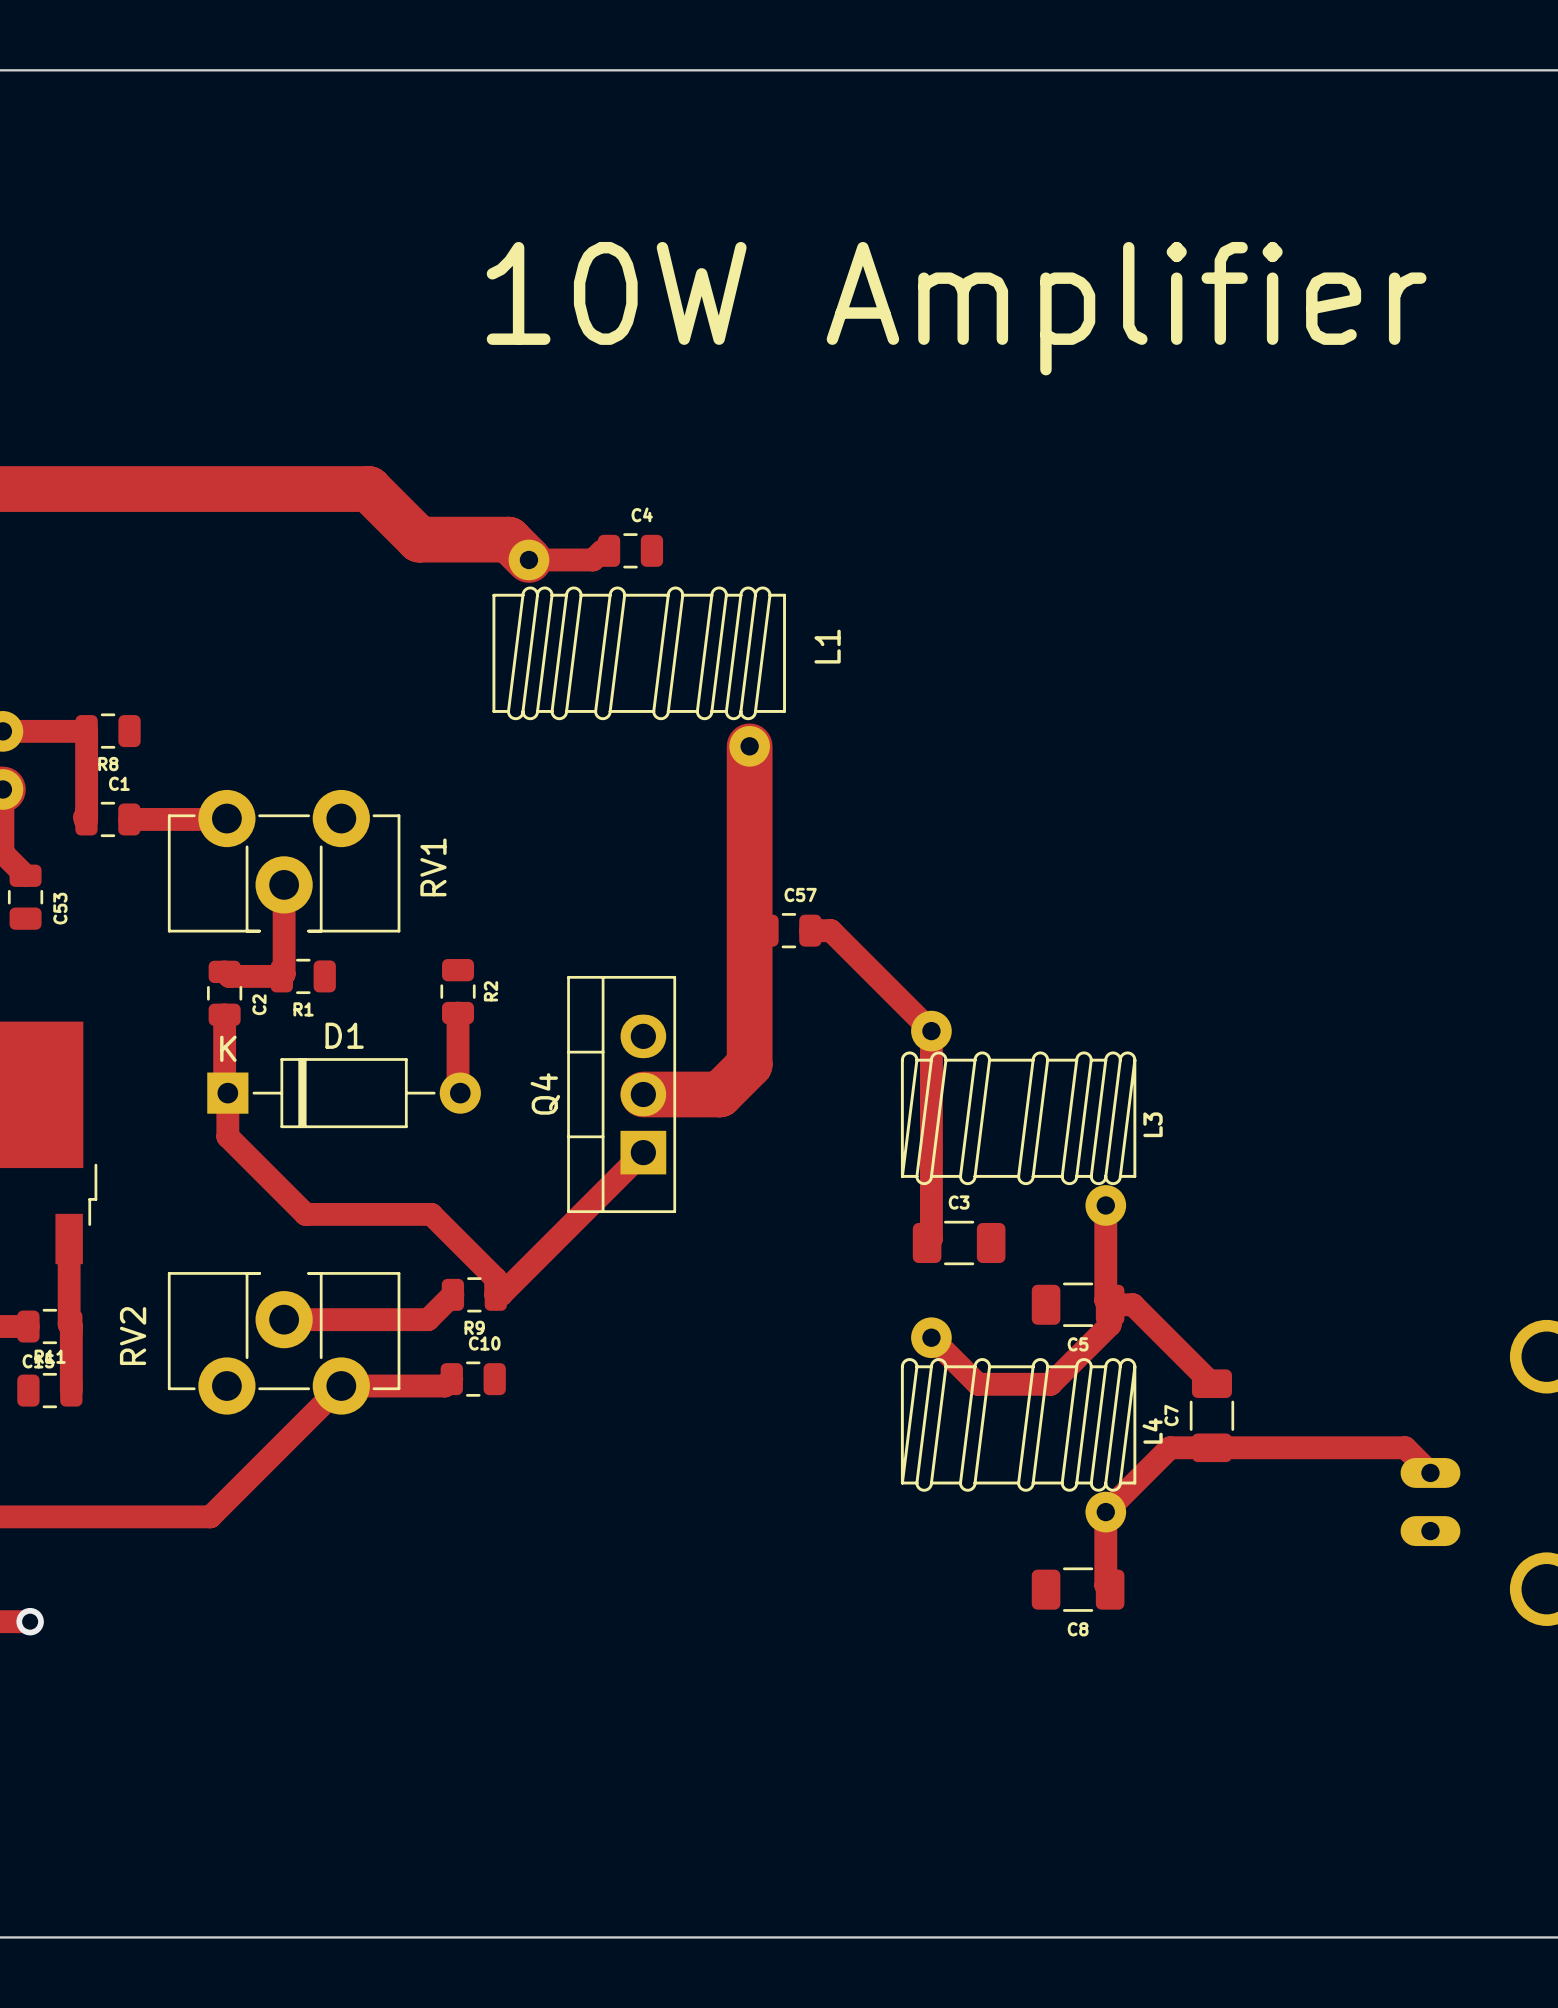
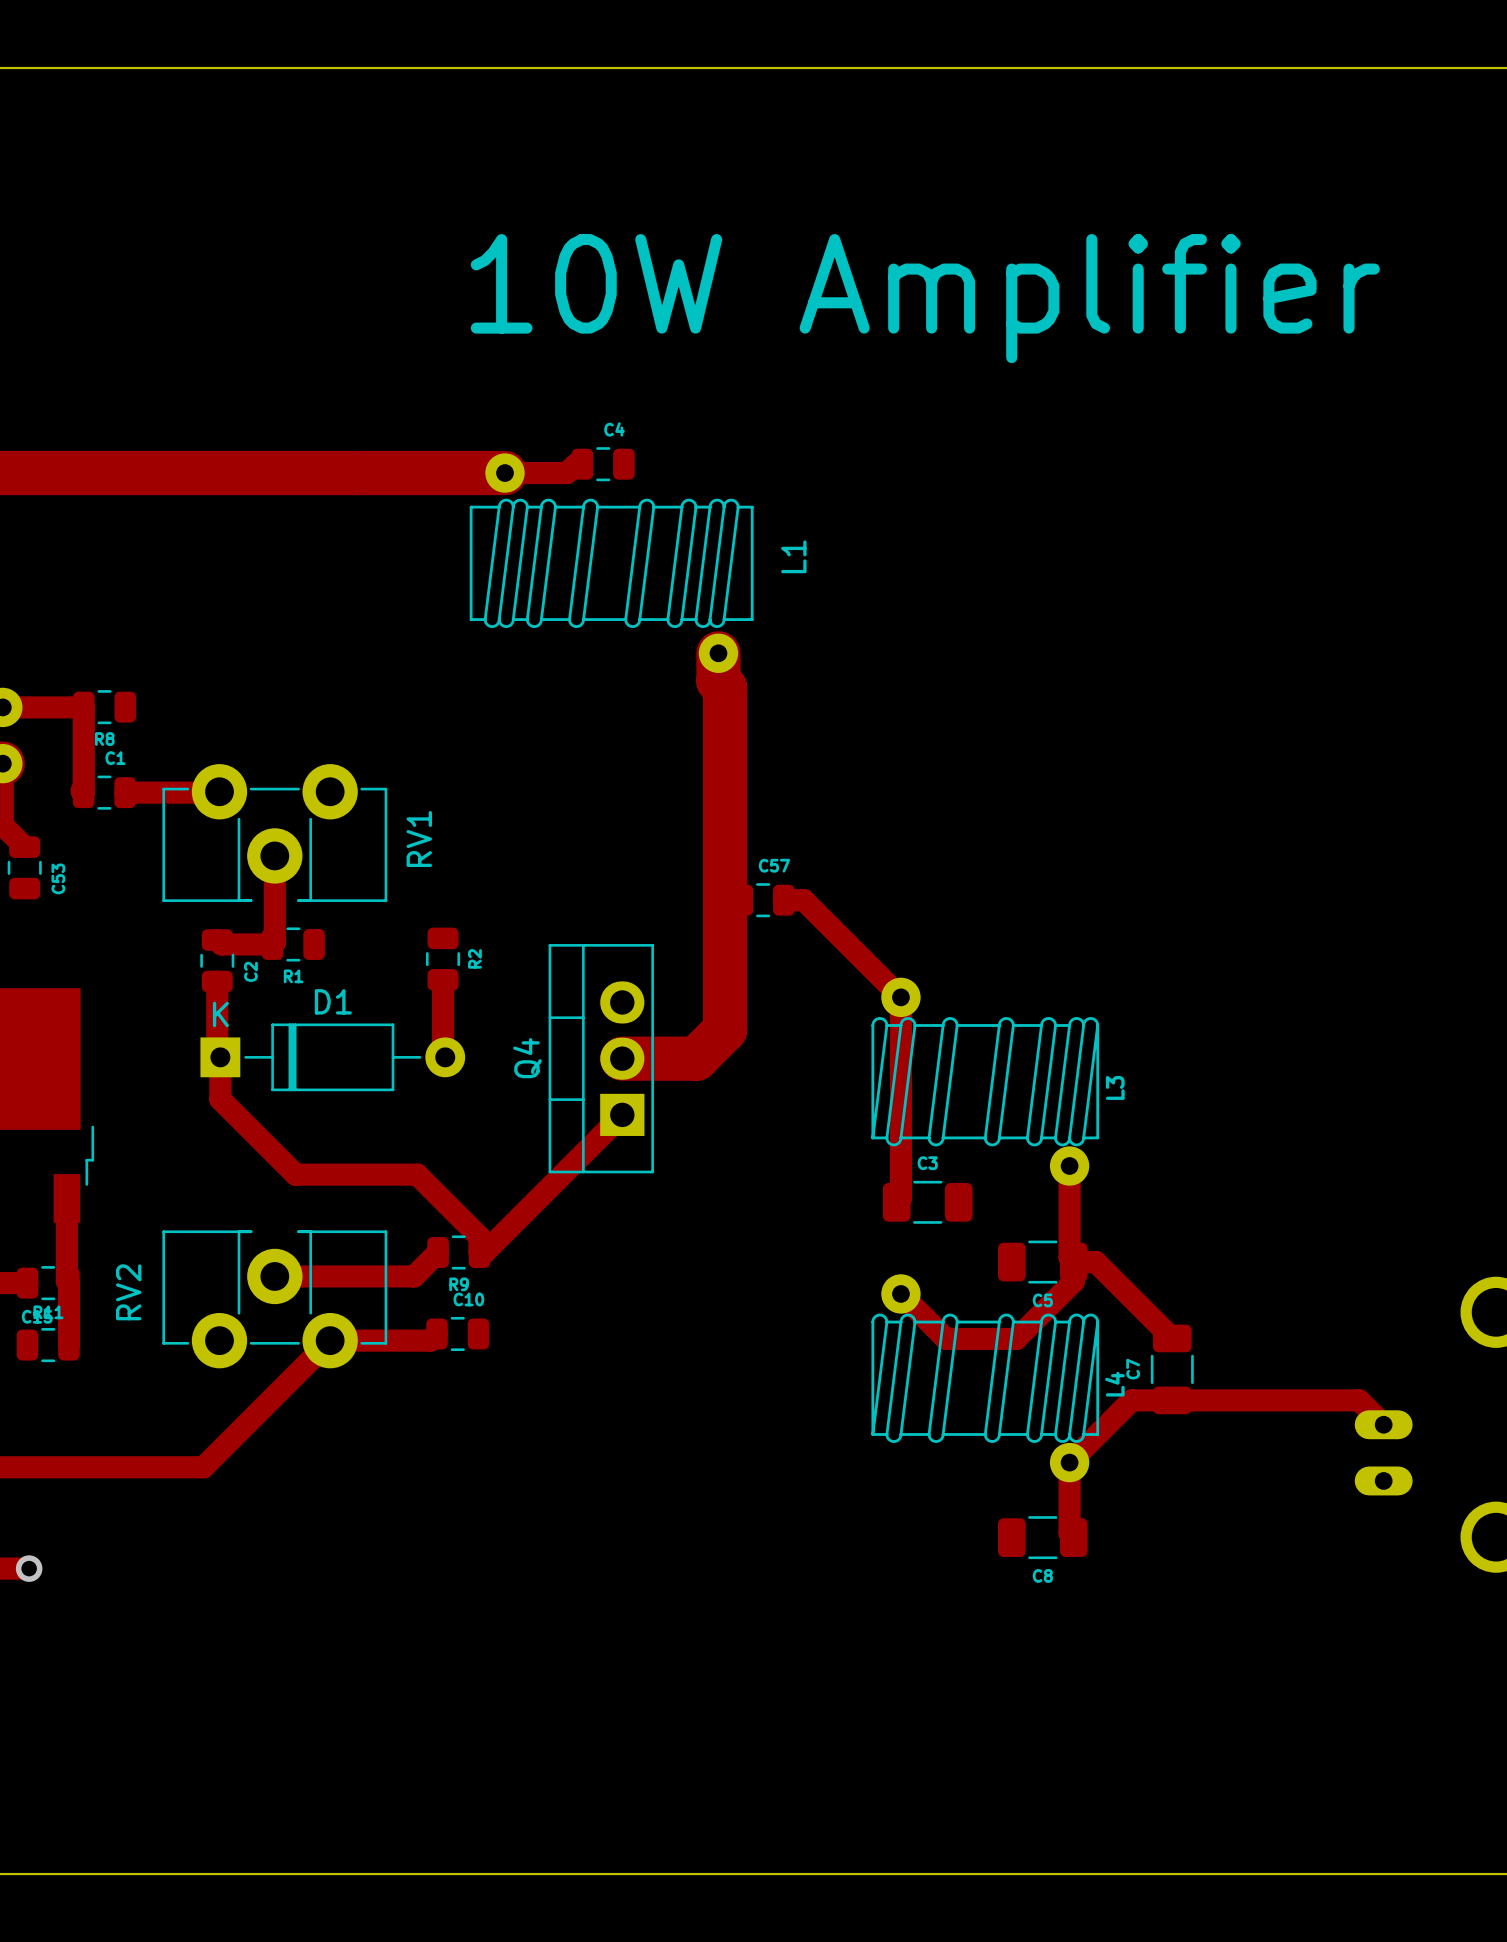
track: (368, 489) (419, 539) (508, 539) (528, 559) (593, 559) (602, 550) -> (356, 473) (566, 473) (575, 464)
C4 position: (630, 550) -> (603, 464)
L1 position: (639, 653) -> (611, 563)
track: none -> (718, 653) (718, 681) (725, 687) (725, 721)

